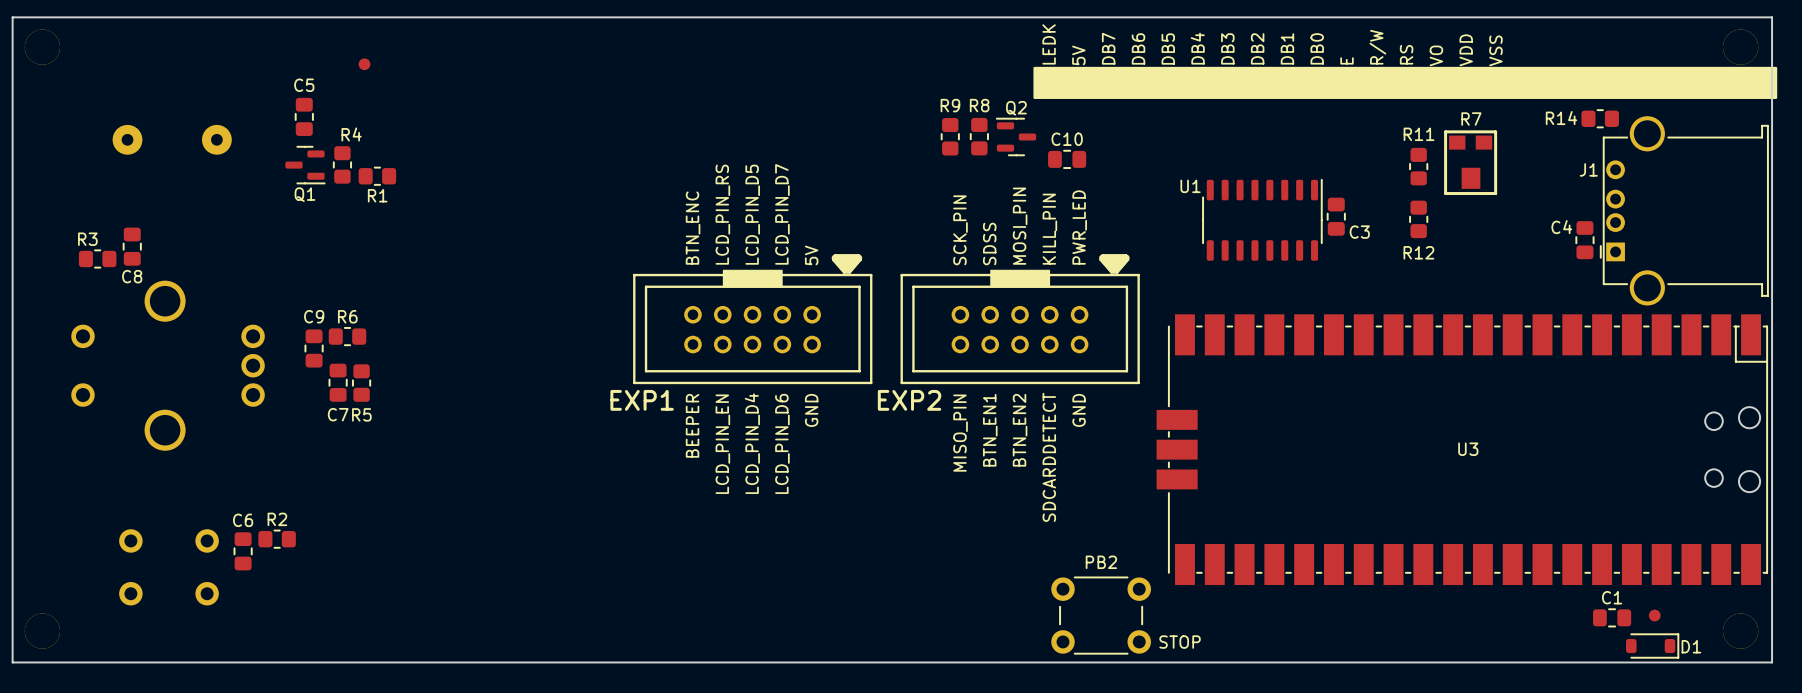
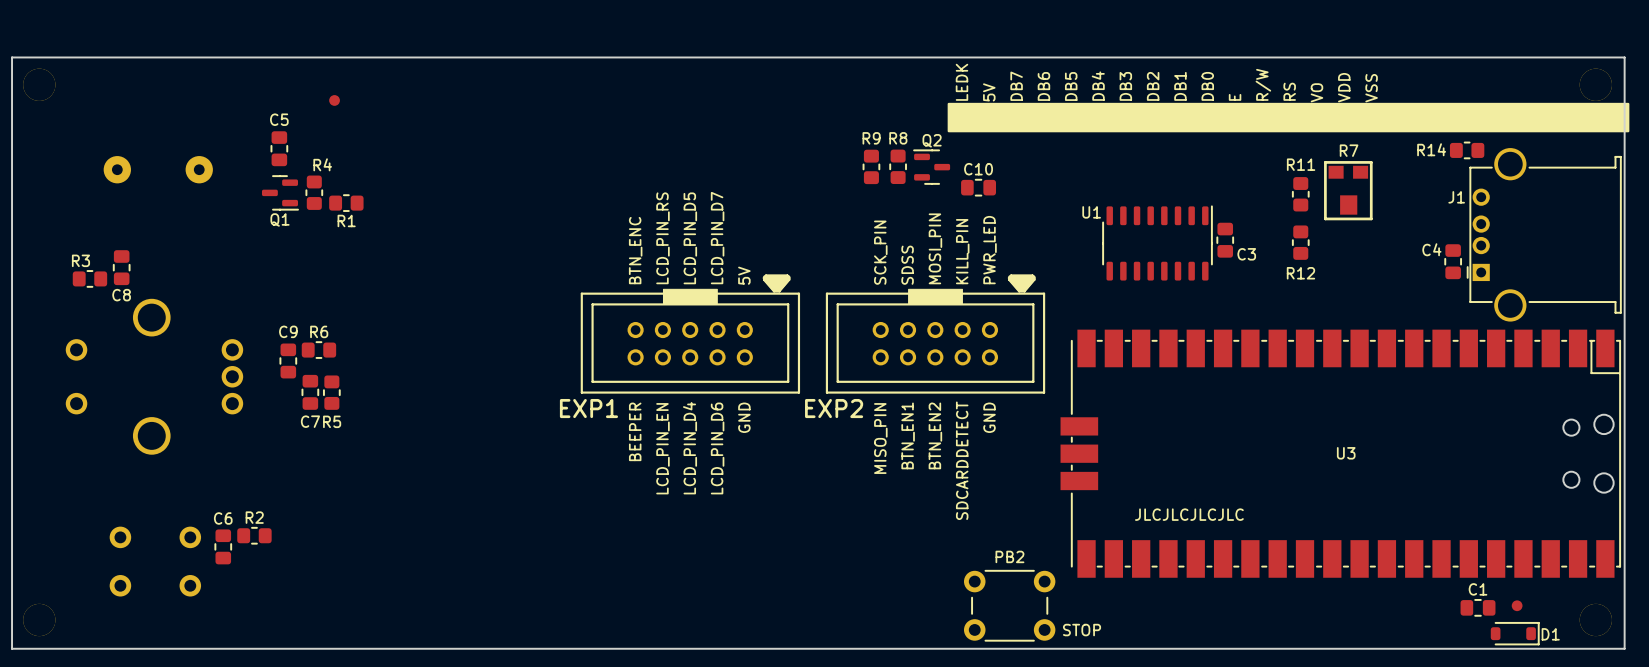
text: none -> JLCJLCJLCJLC (1189, 514)

